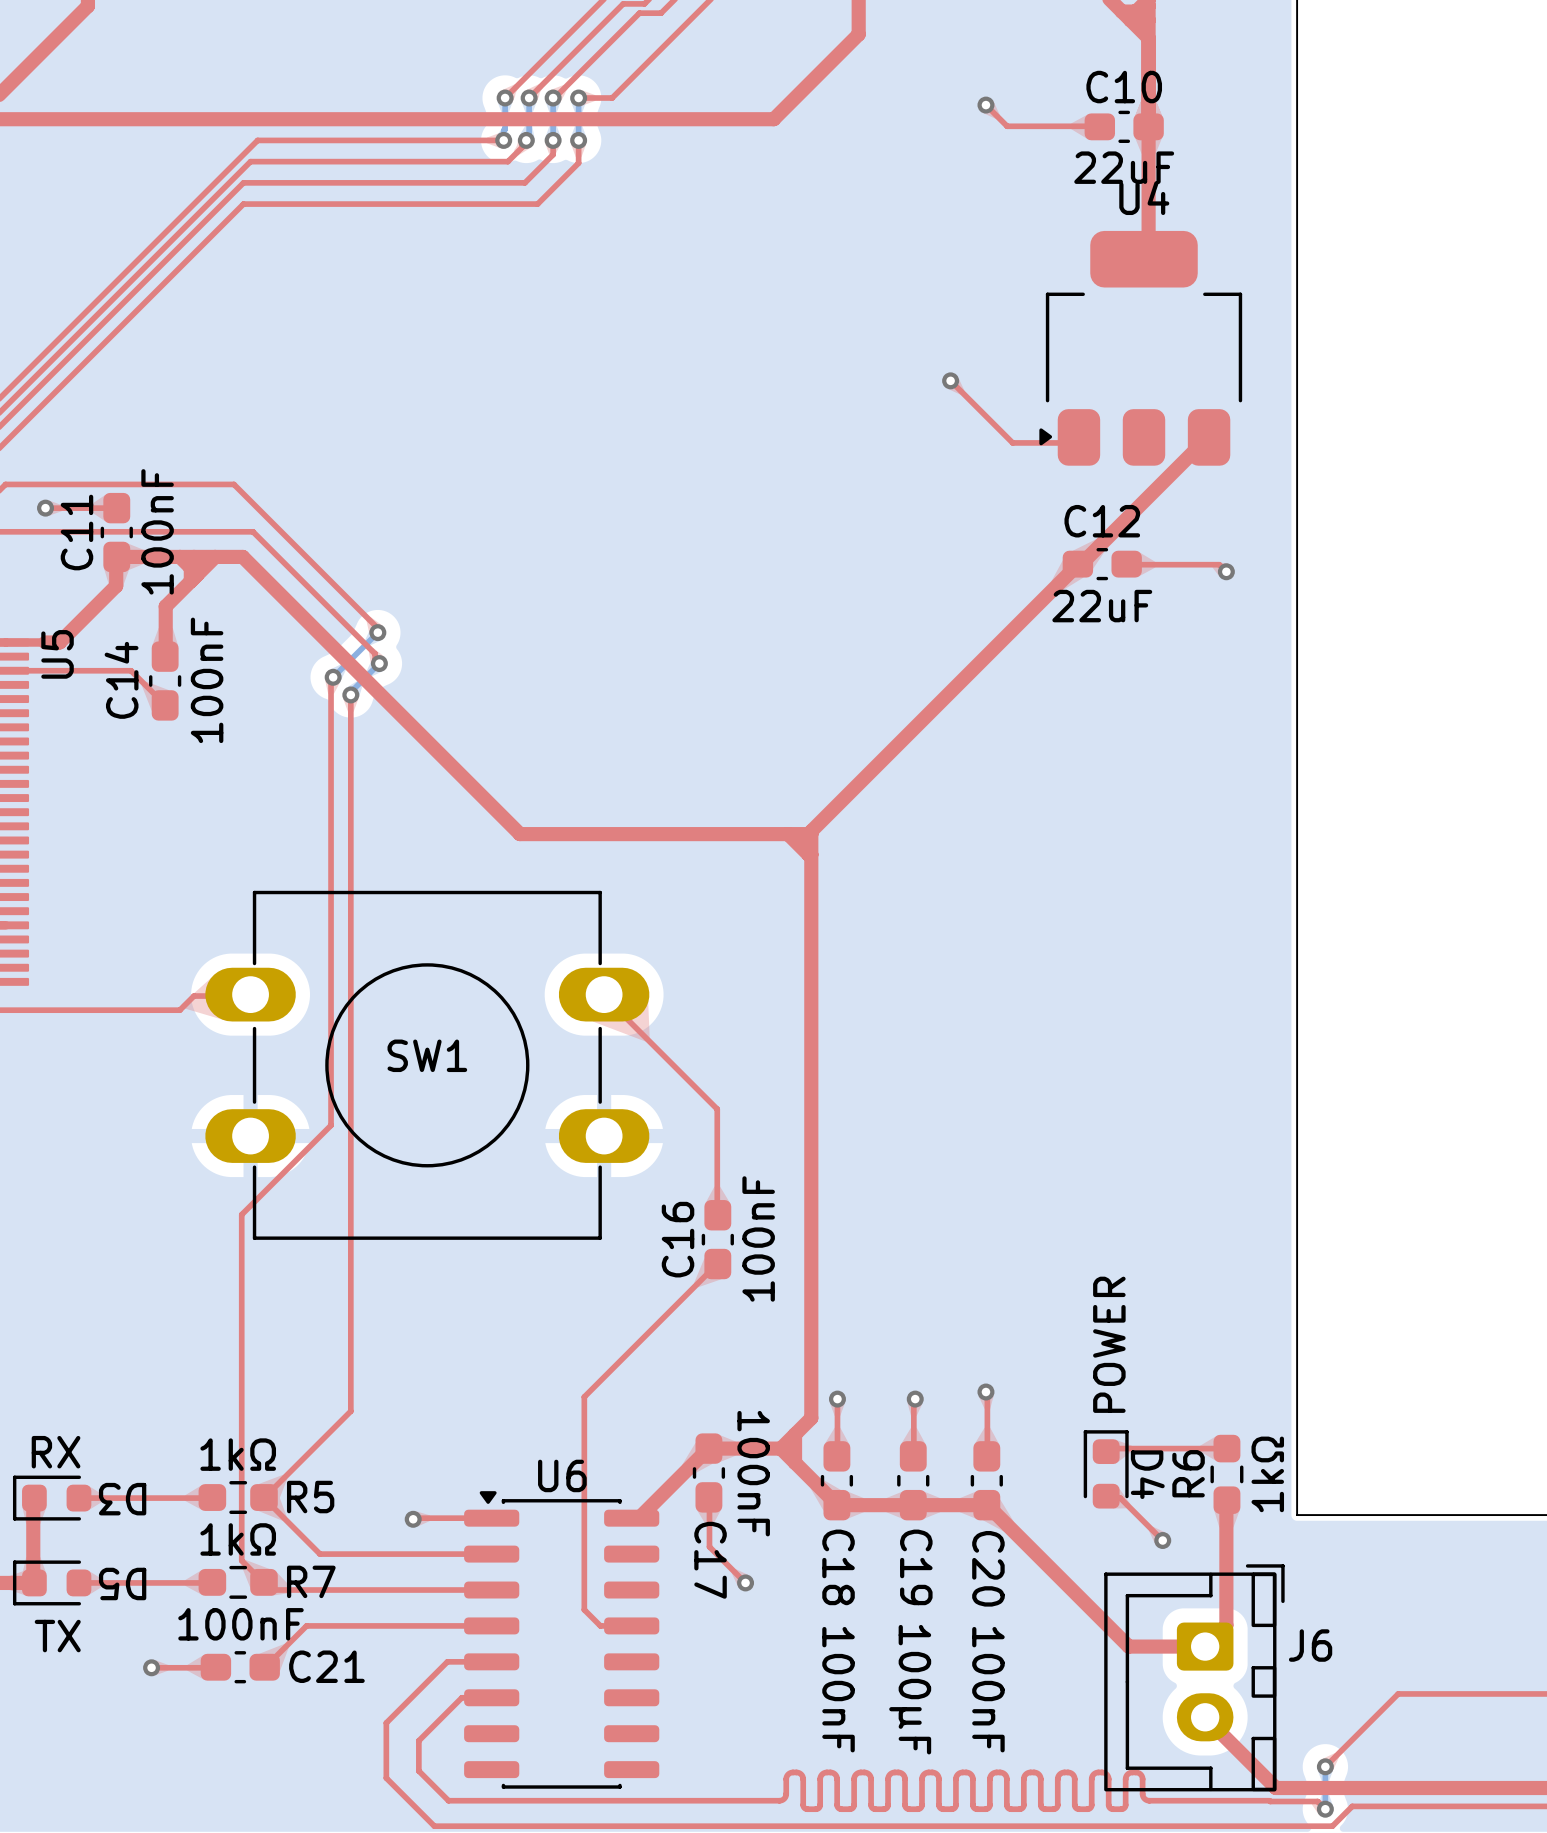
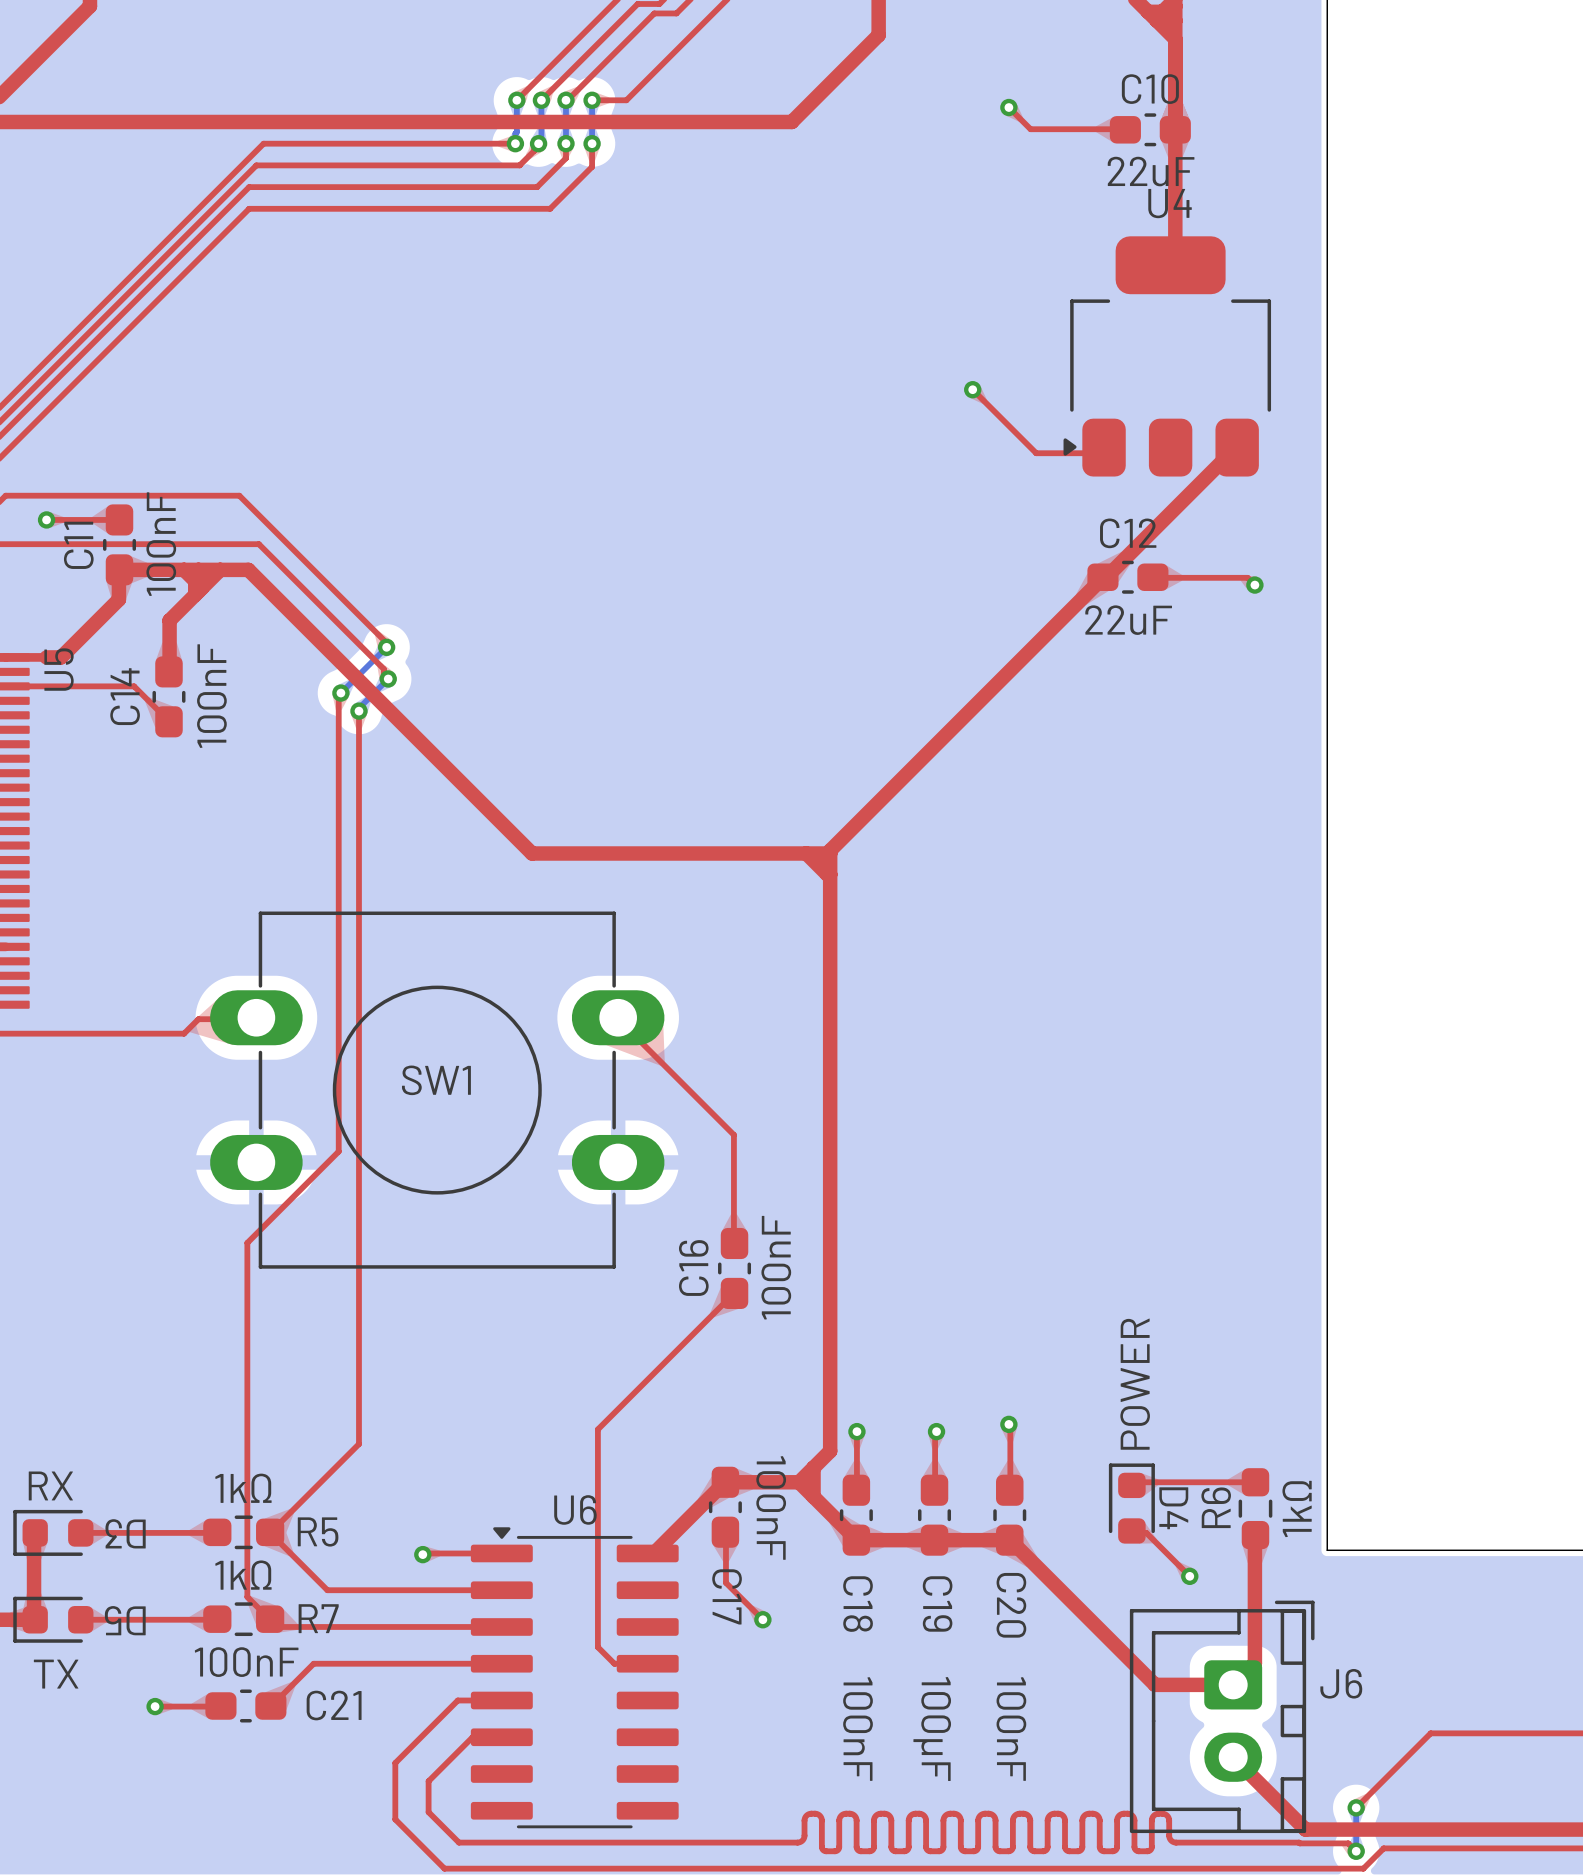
U6 footprint: [464, 1491, 660, 1789] -> [470, 1527, 679, 1829]

